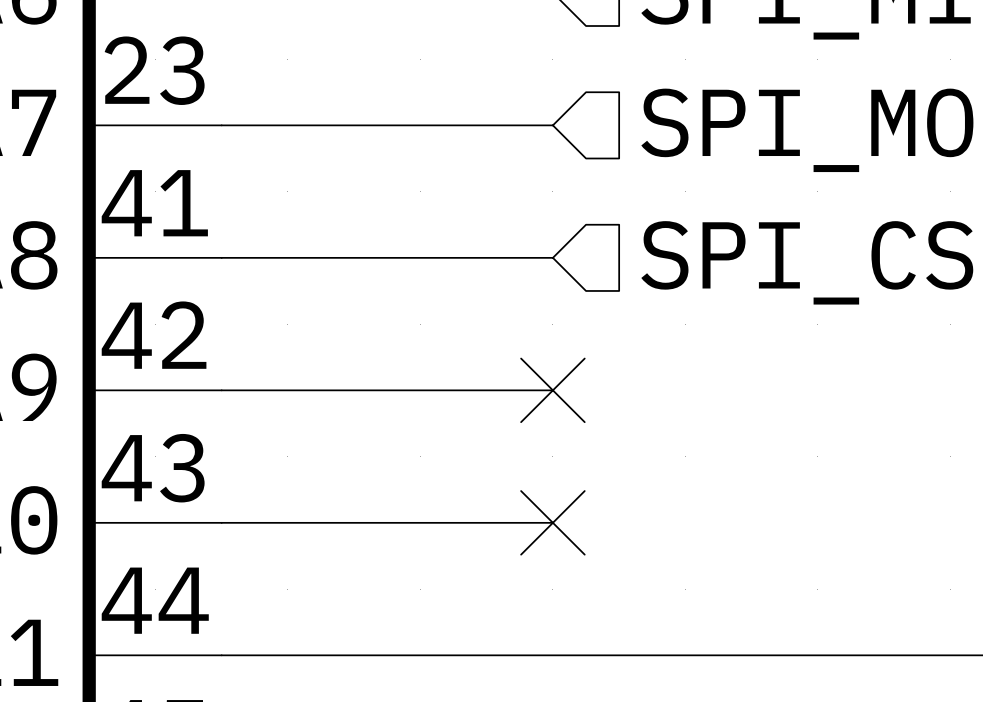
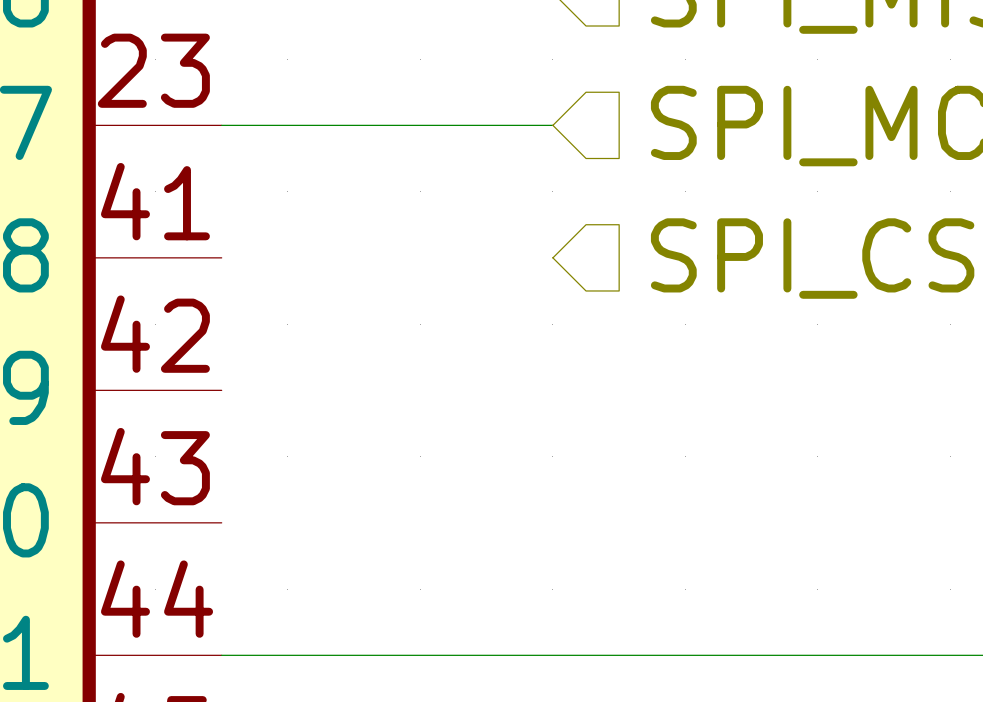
wire: (221, 257) (552, 257) -> none
wire: (221, 390) (552, 390) -> none
no-connect mark: (552, 390) -> none
wire: (221, 522) (552, 522) -> none
no-connect mark: (552, 522) -> none

